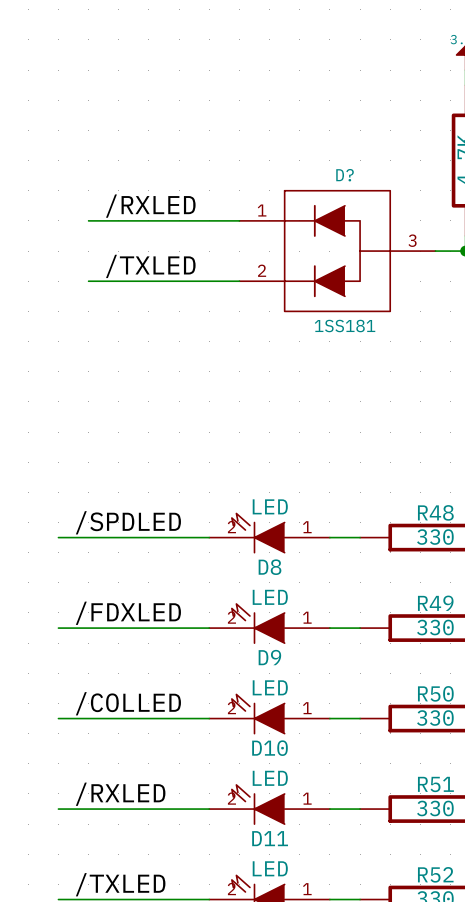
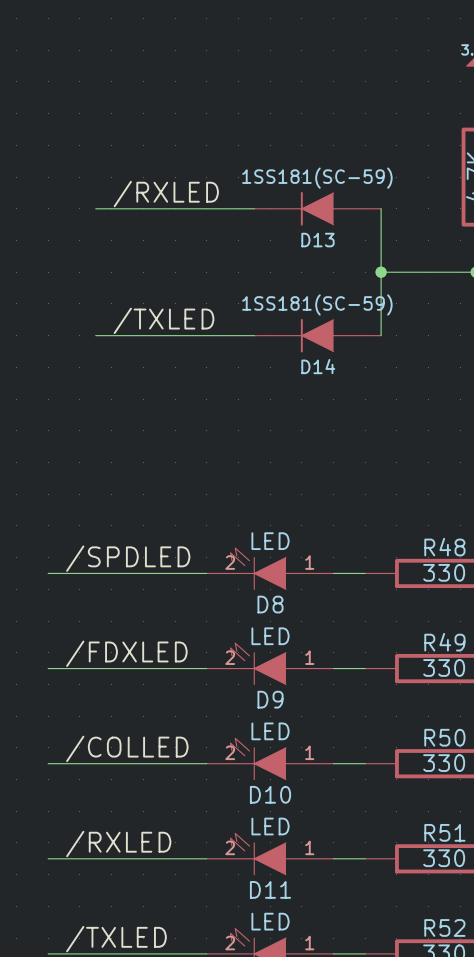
D13: none -> 1SS181(SC-59) (317, 208)
wire: none -> (381, 208) (381, 335)
label position: /RXLED (150, 206) -> /RXLED (166, 194)
wire: (88, 220) (239, 220) -> (95, 208) (254, 208)
D?: 1SS181 (337, 251) -> none
junction: none -> (381, 272)
label position: /TXLED (150, 266) -> /TXLED (164, 320)
wire: (88, 281) (239, 281) -> (95, 335) (254, 335)
D14: none -> 1SS181(SC-59) (317, 335)

